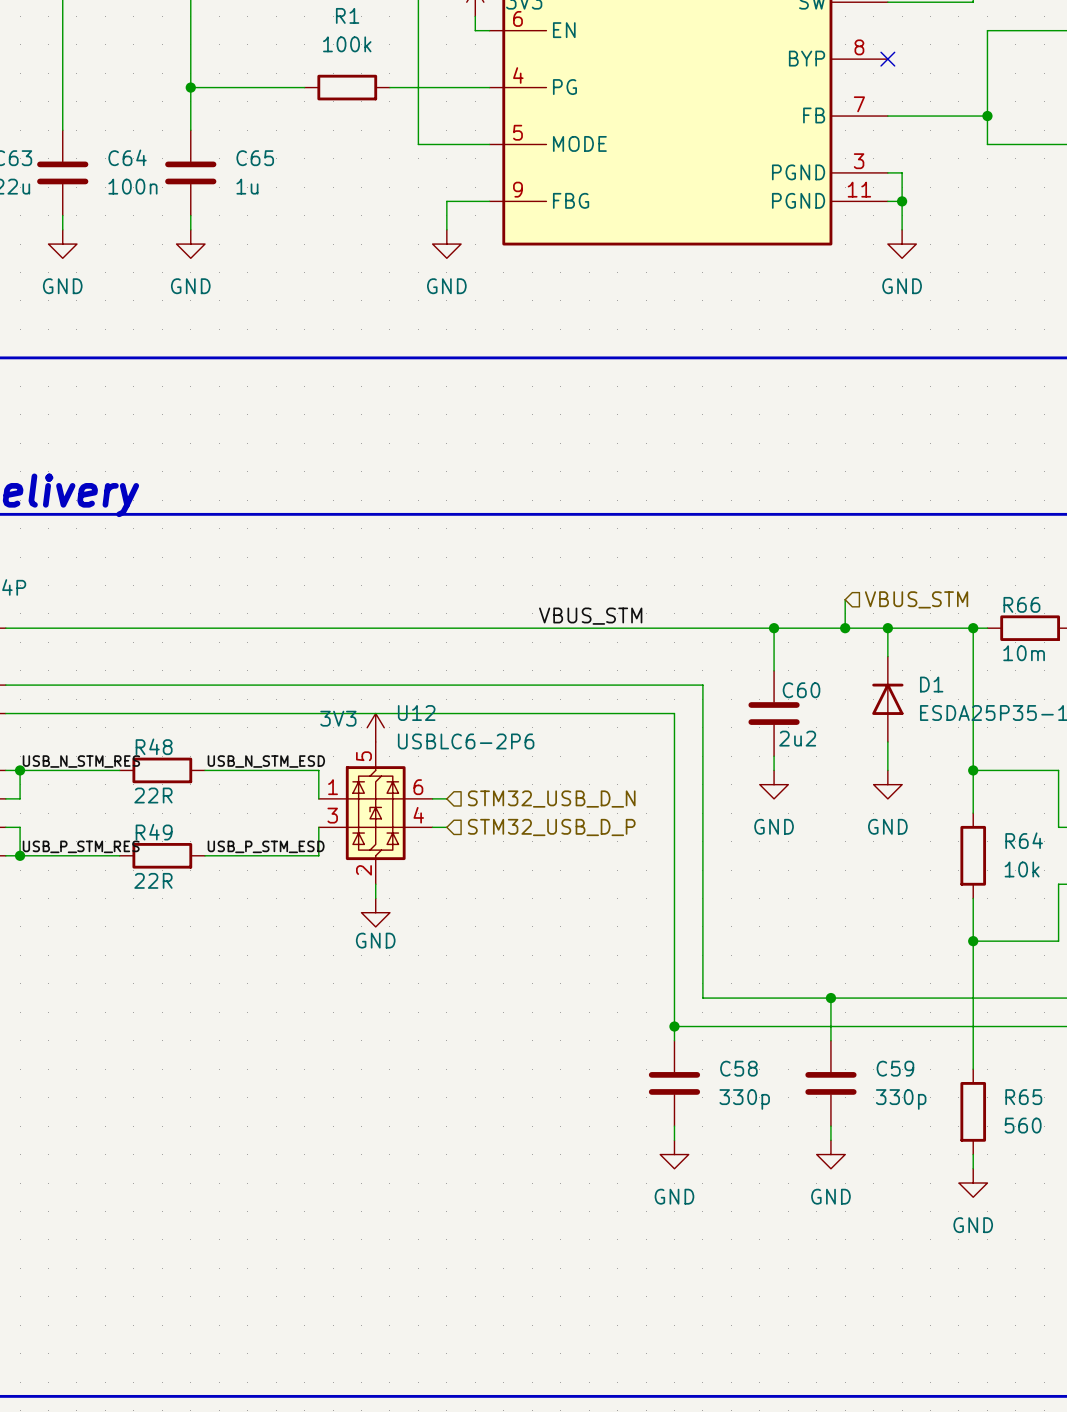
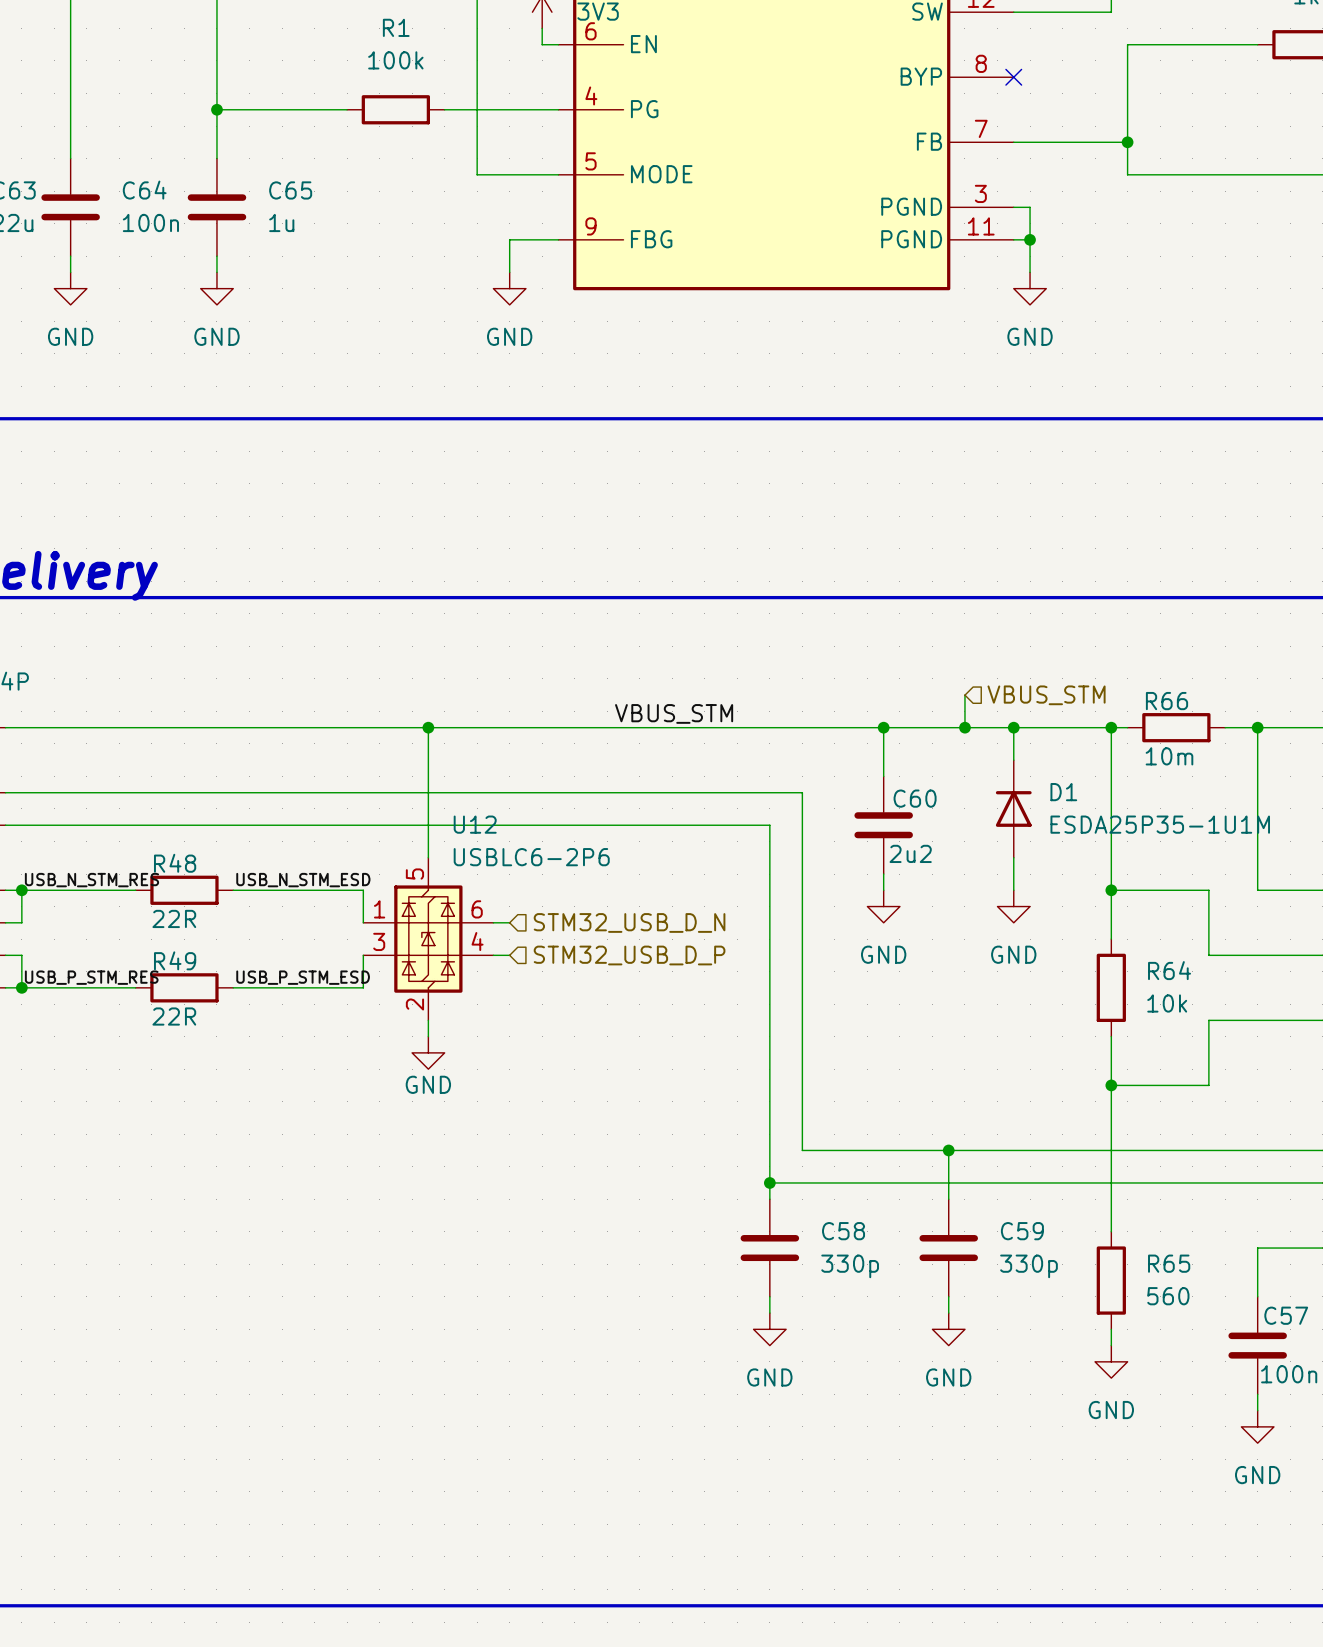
wire: none -> (428, 727) (428, 857)
junction: none -> (428, 727)
power symbol: 3V3 (375, 727) -> none

